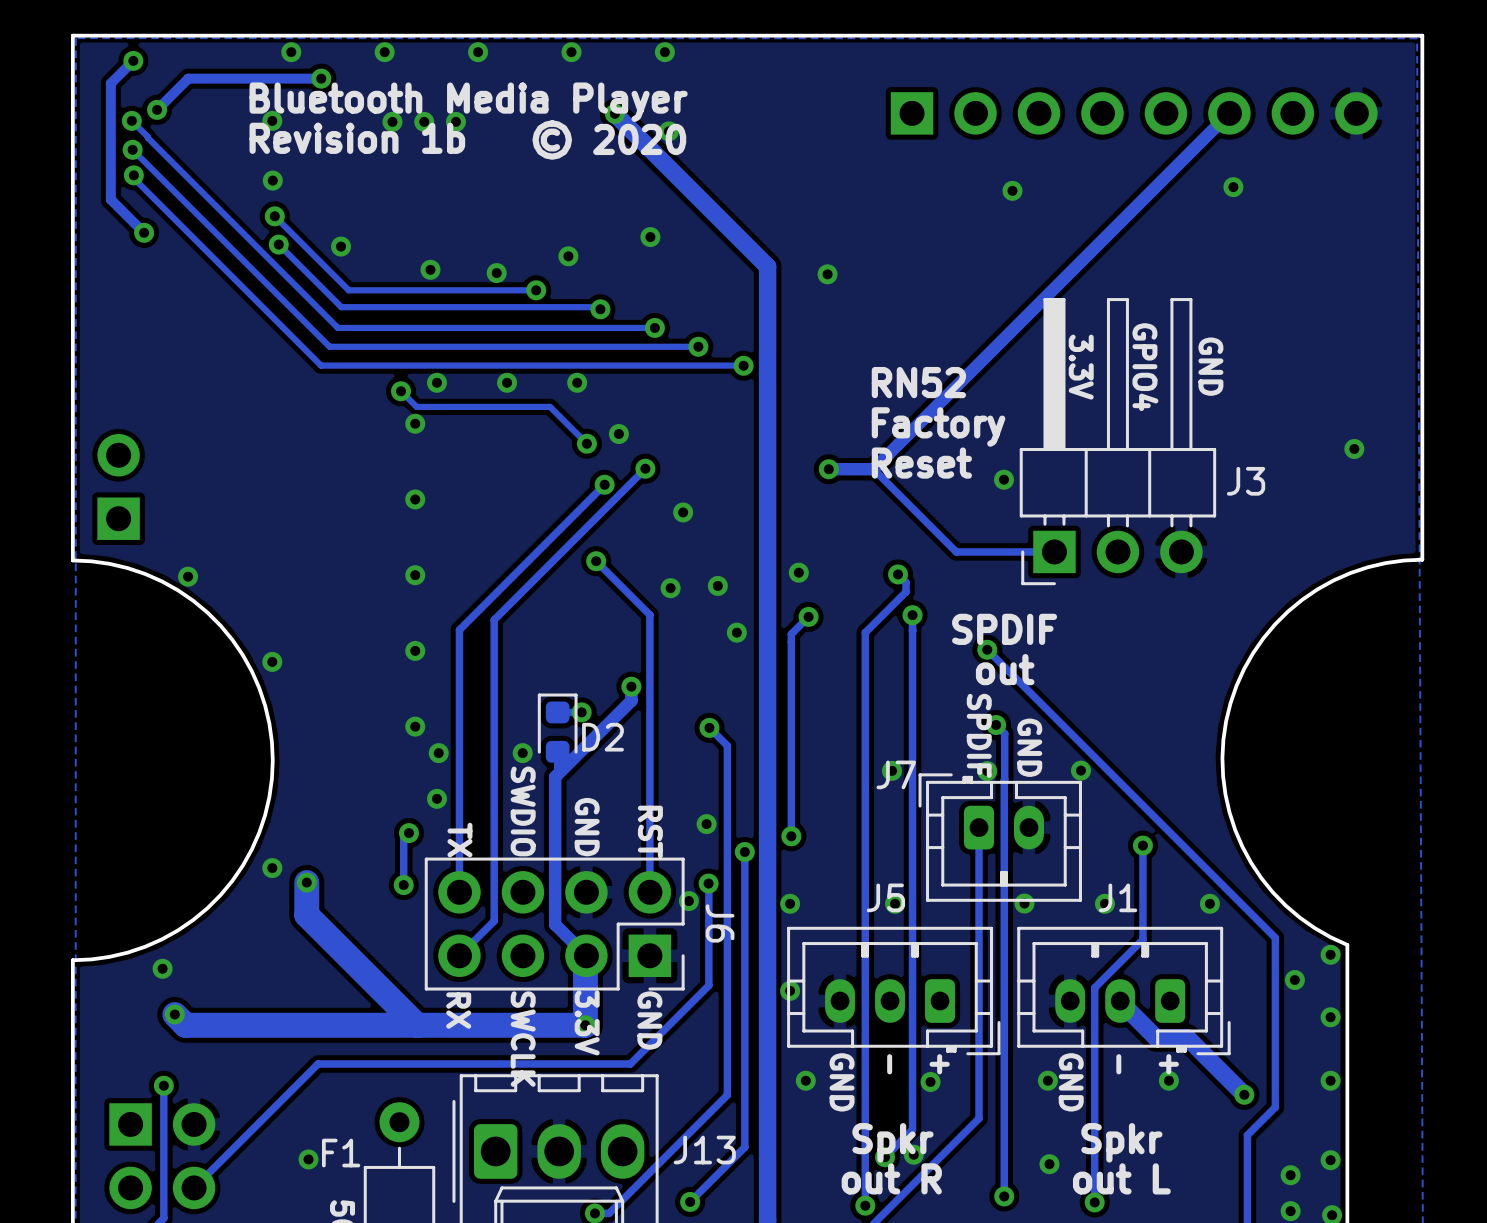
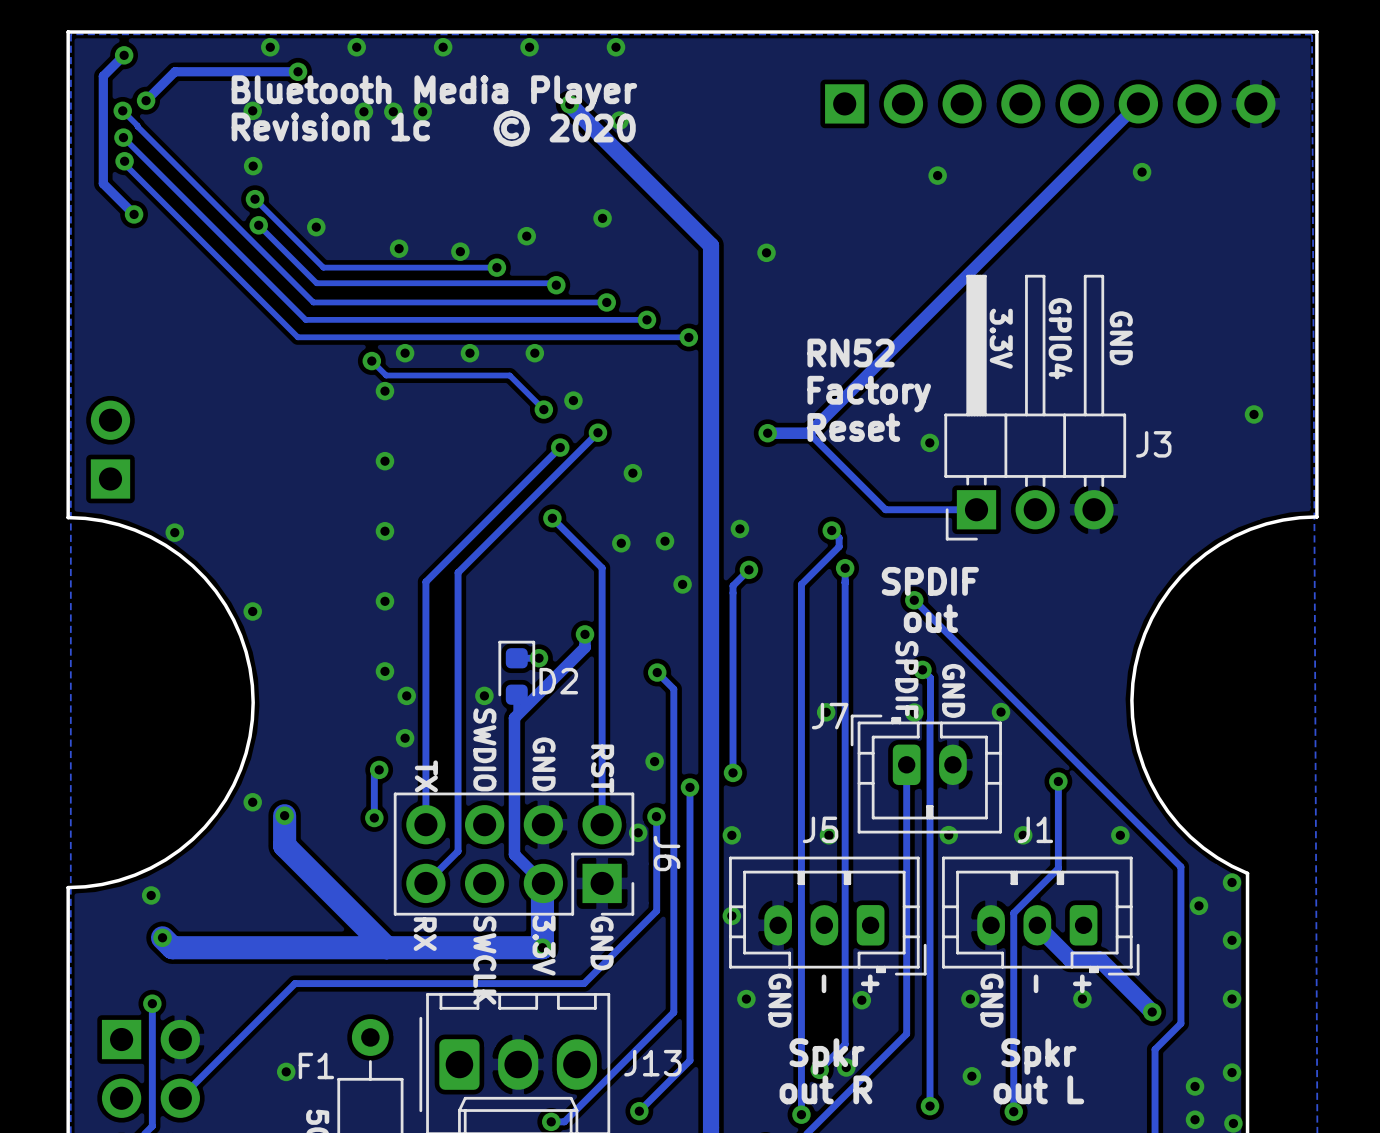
text: Revision 1b (357, 138) -> Revision 1c (330, 126)

